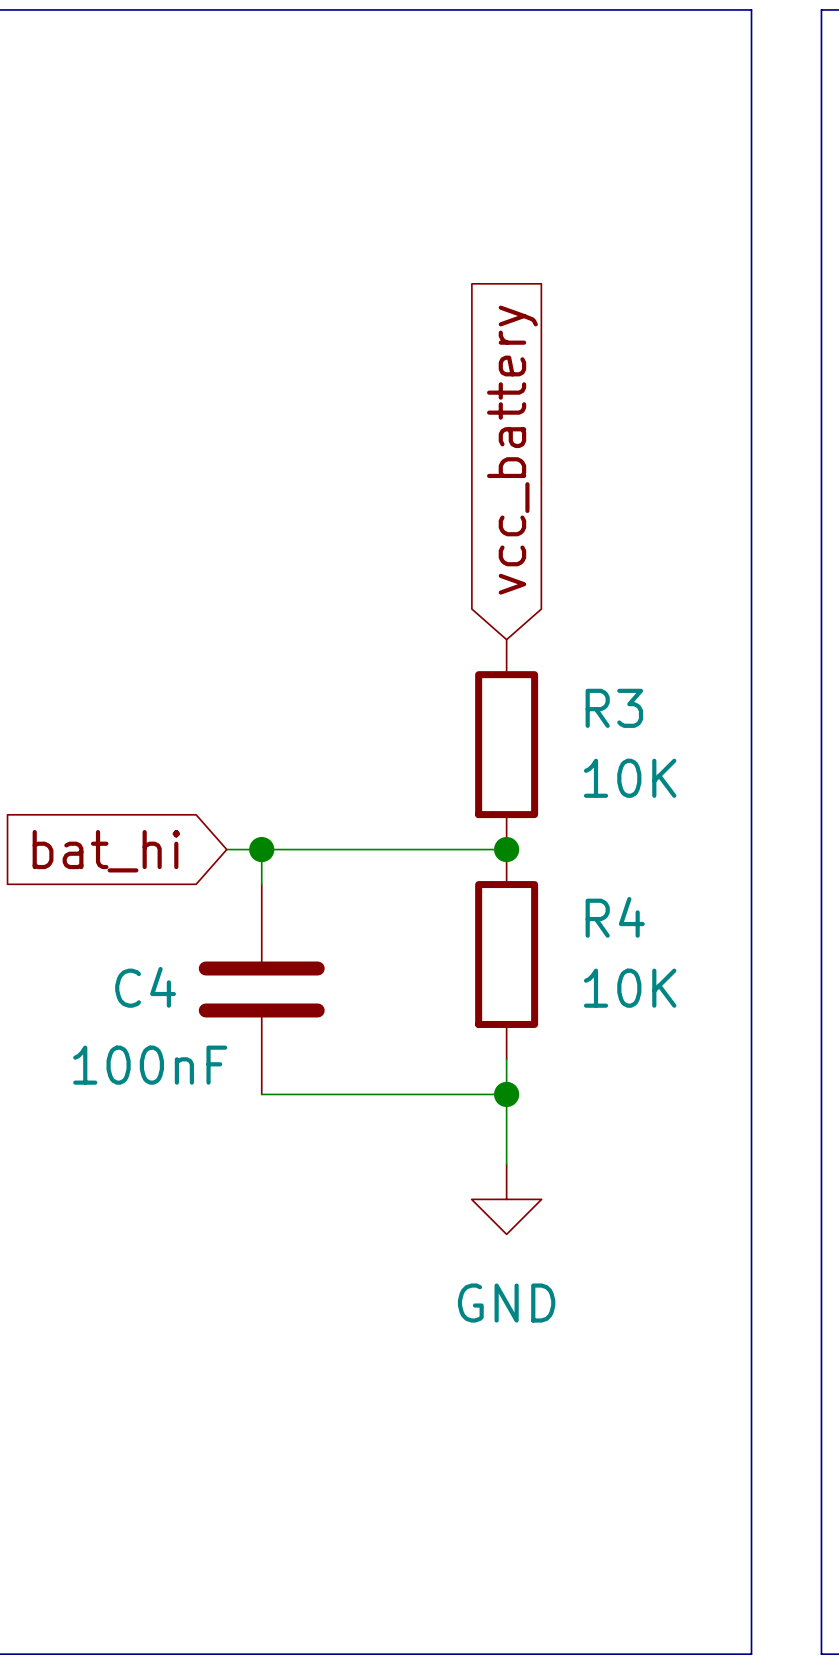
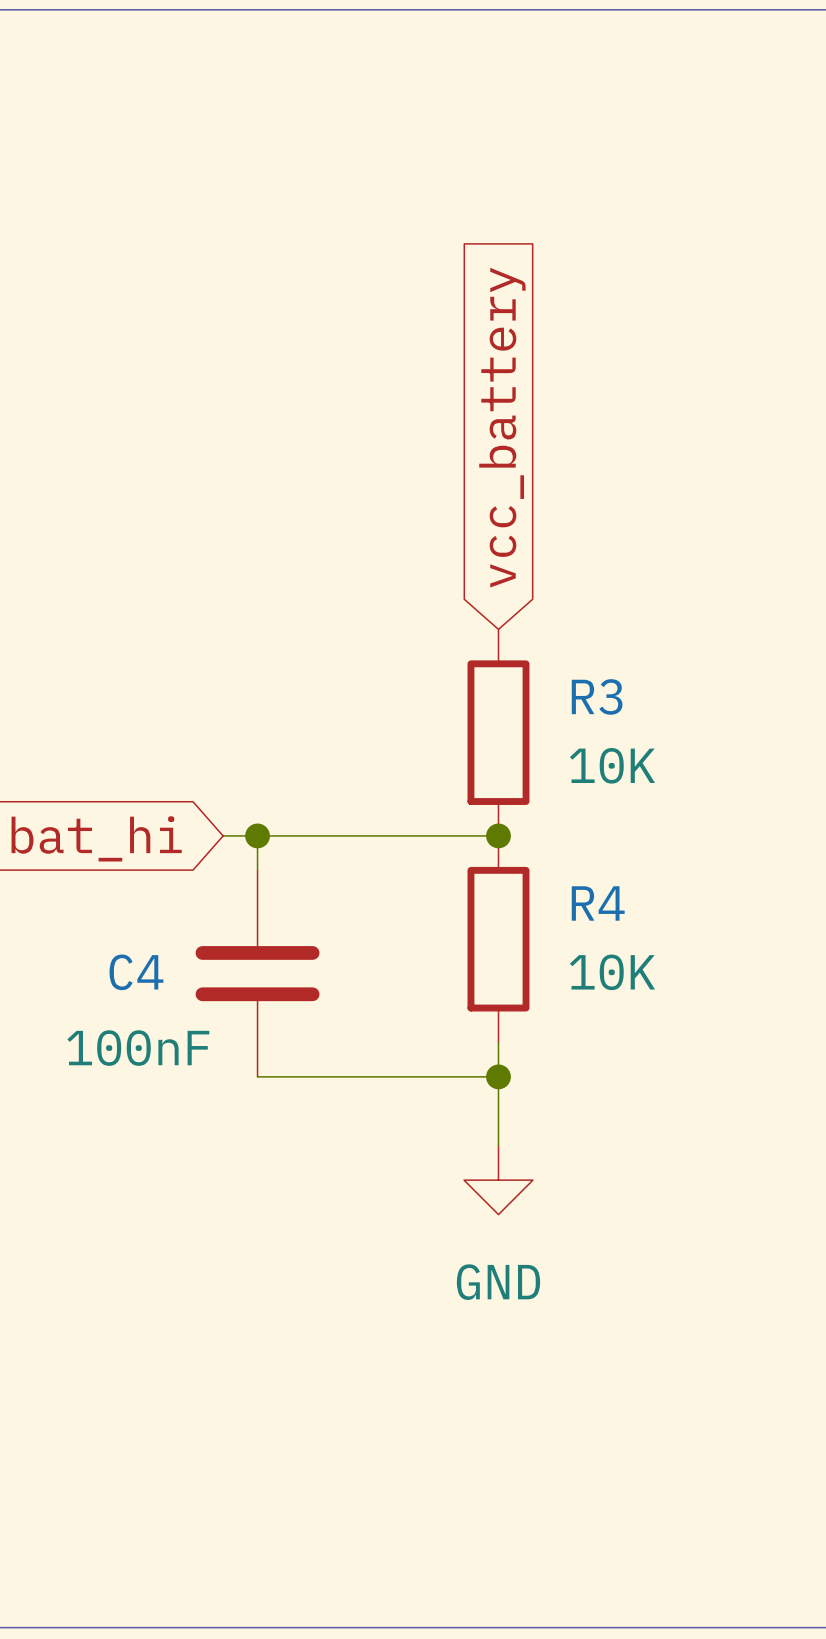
line: (751, 9) (751, 1654) -> (739, 9) (808, 9)
line: (821, 9) (821, 1654) -> (739, 1627) (808, 1627)

